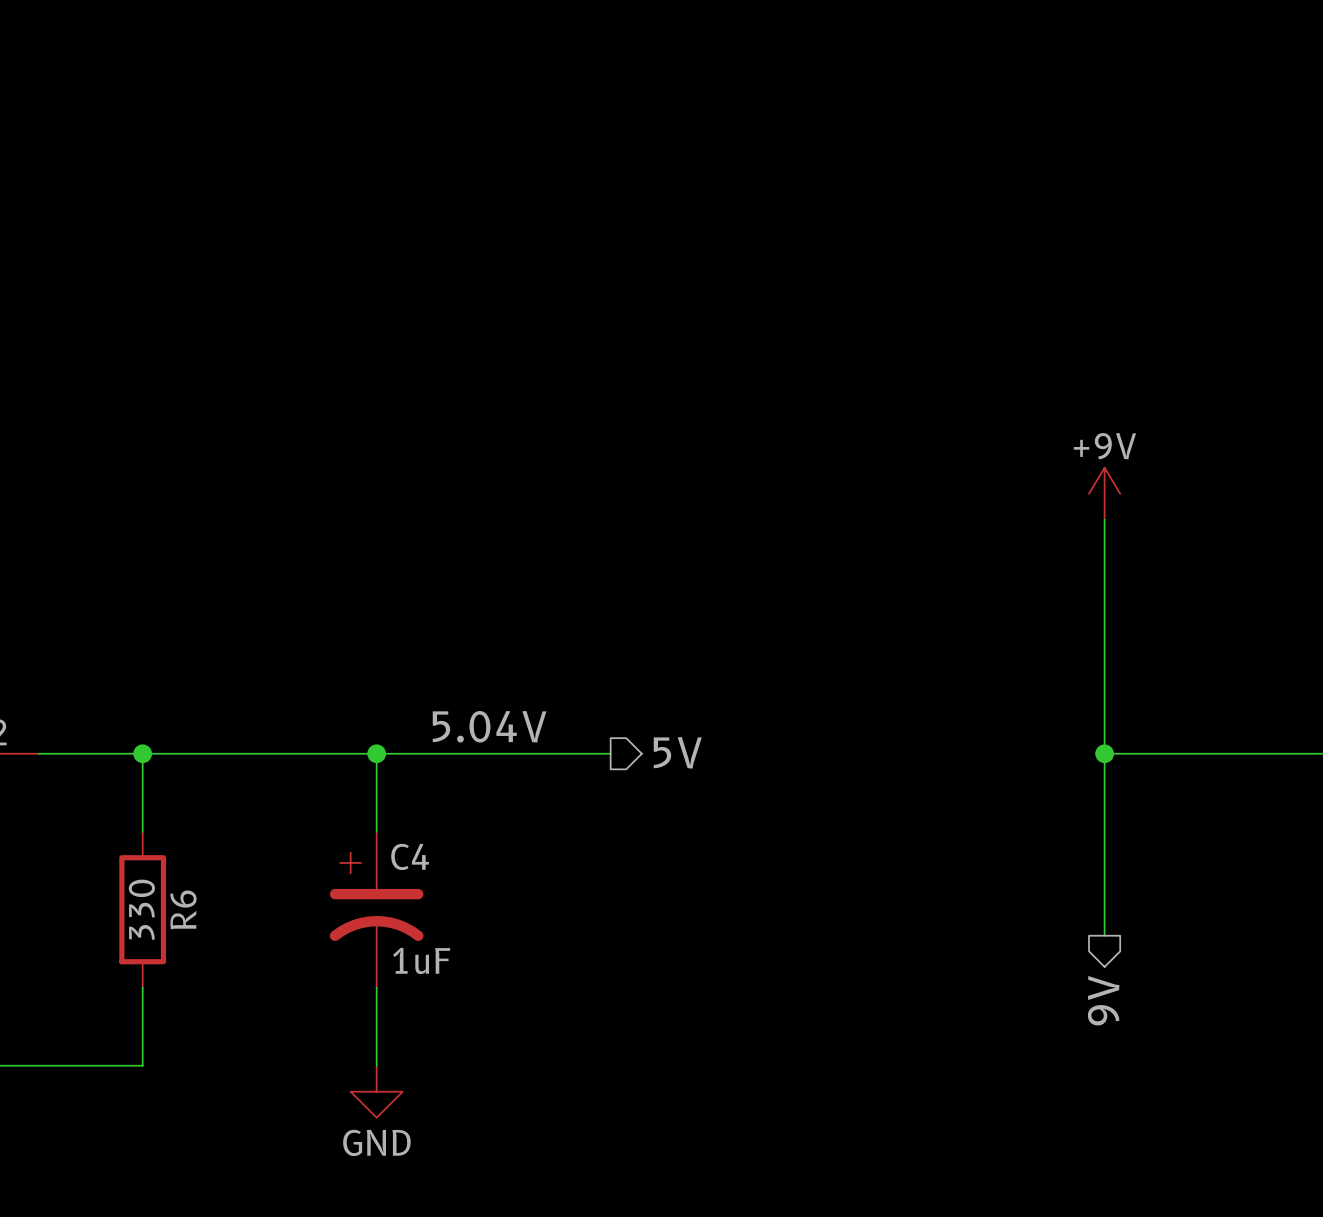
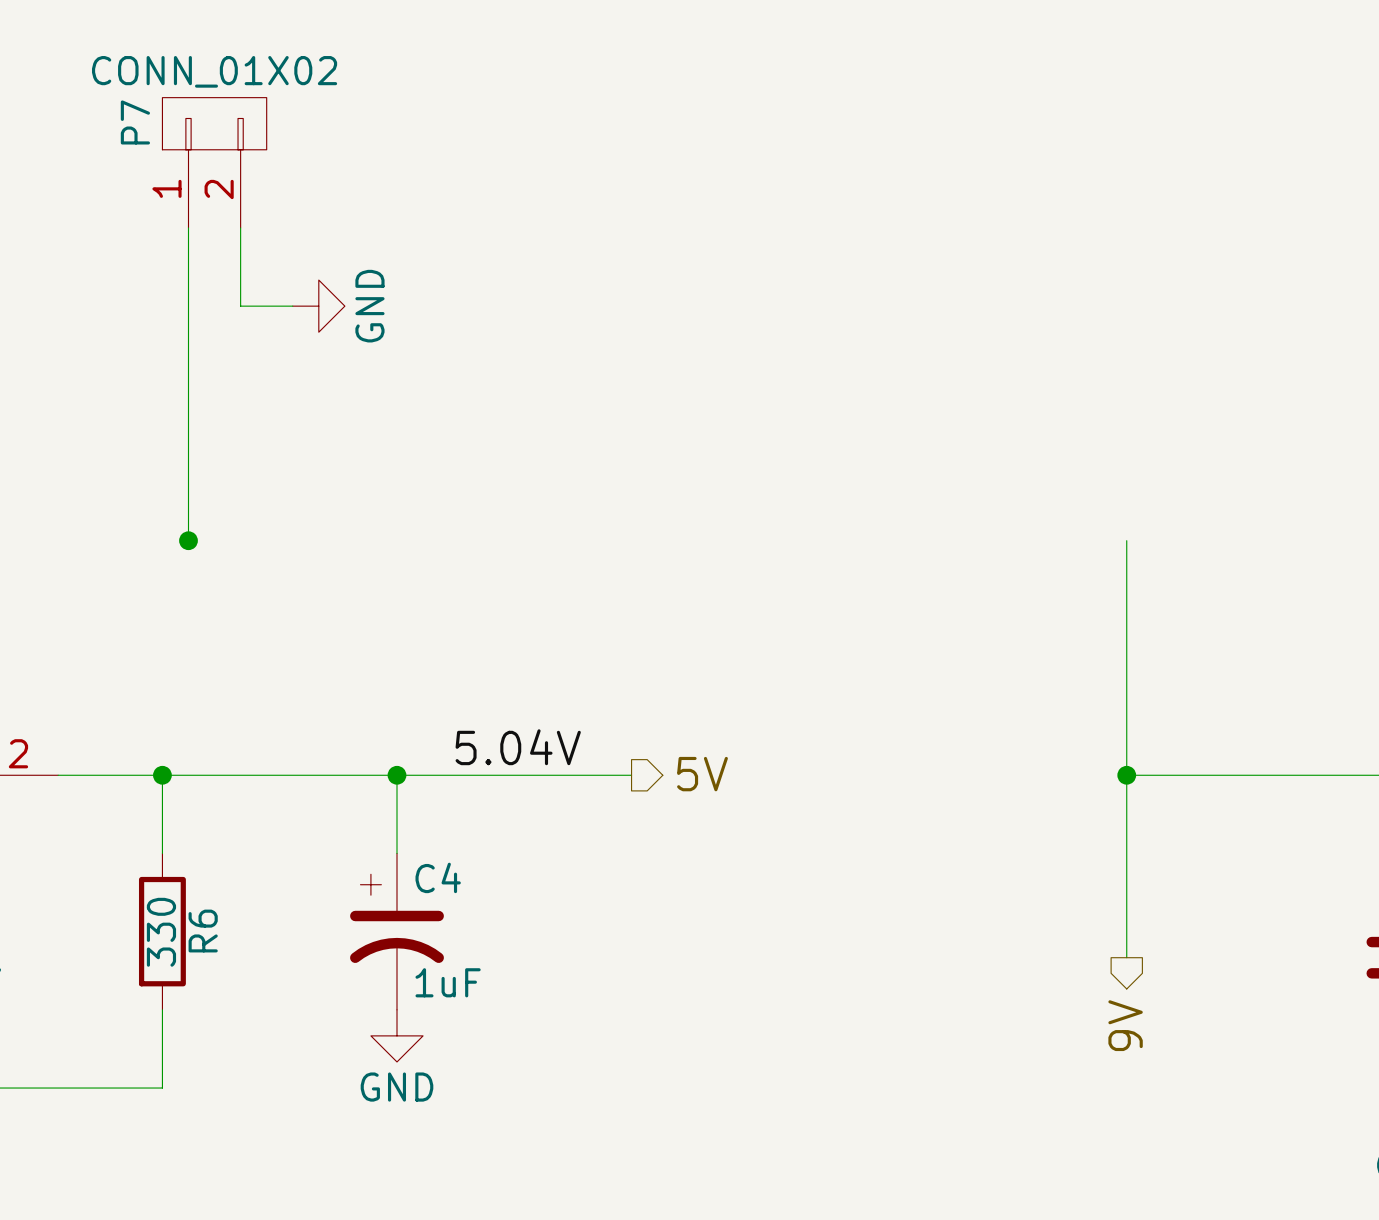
P7: none -> CONN_01X02 (214, 162)
wire: none -> (188, 227) (188, 540)
wire: none -> (240, 227) (240, 306) (292, 306)
power symbol: none -> GND (318, 306)
power symbol: +9V (1104, 493) -> none
junction: none -> (188, 540)
wire: (376, 987) (376, 1065) -> none
power symbol position: GND (376, 1091) -> GND (396, 1035)

